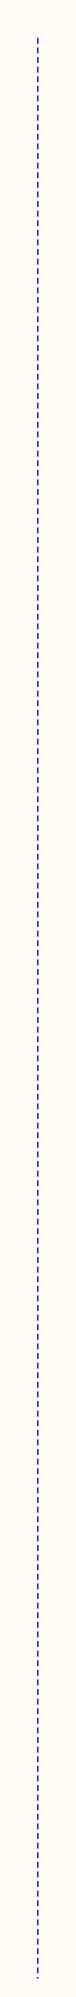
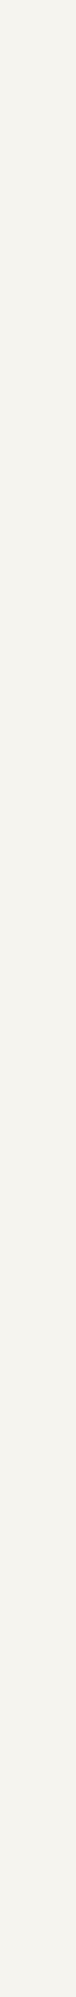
line: (37, 37) (37, 1978) -> none

